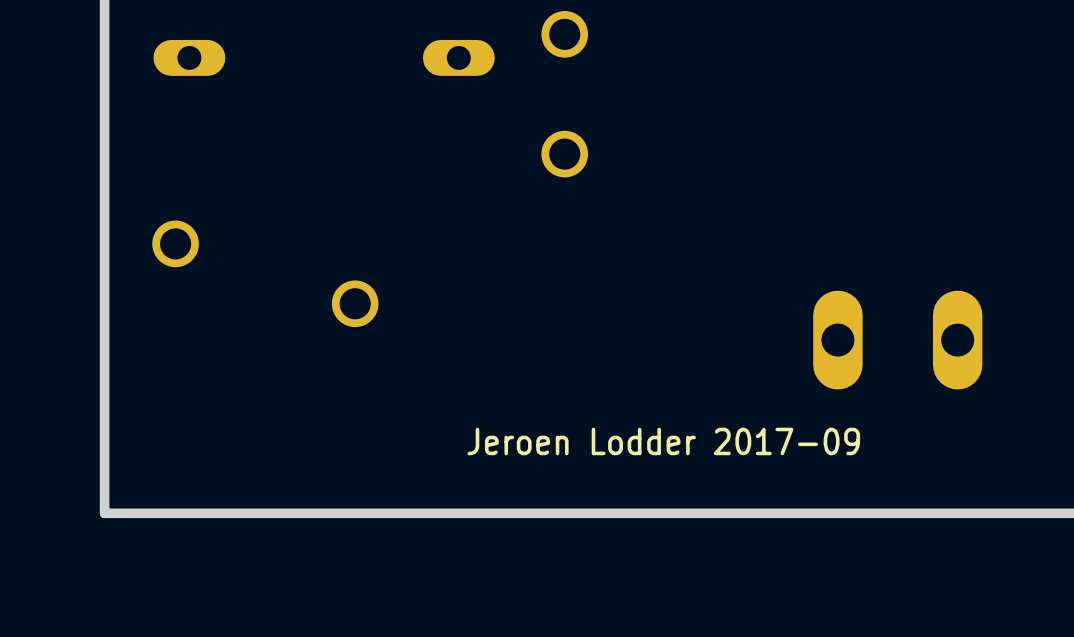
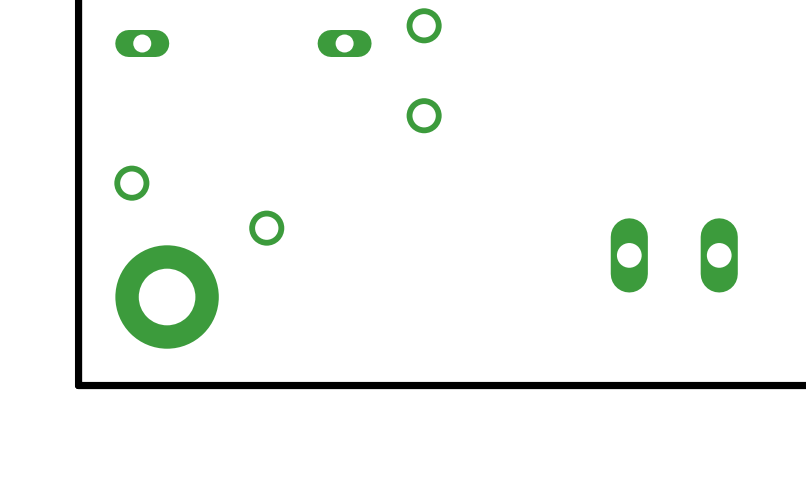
part: none -> (167, 297)
text: Jeroen Lodder 2017-09 (663, 441) -> none

